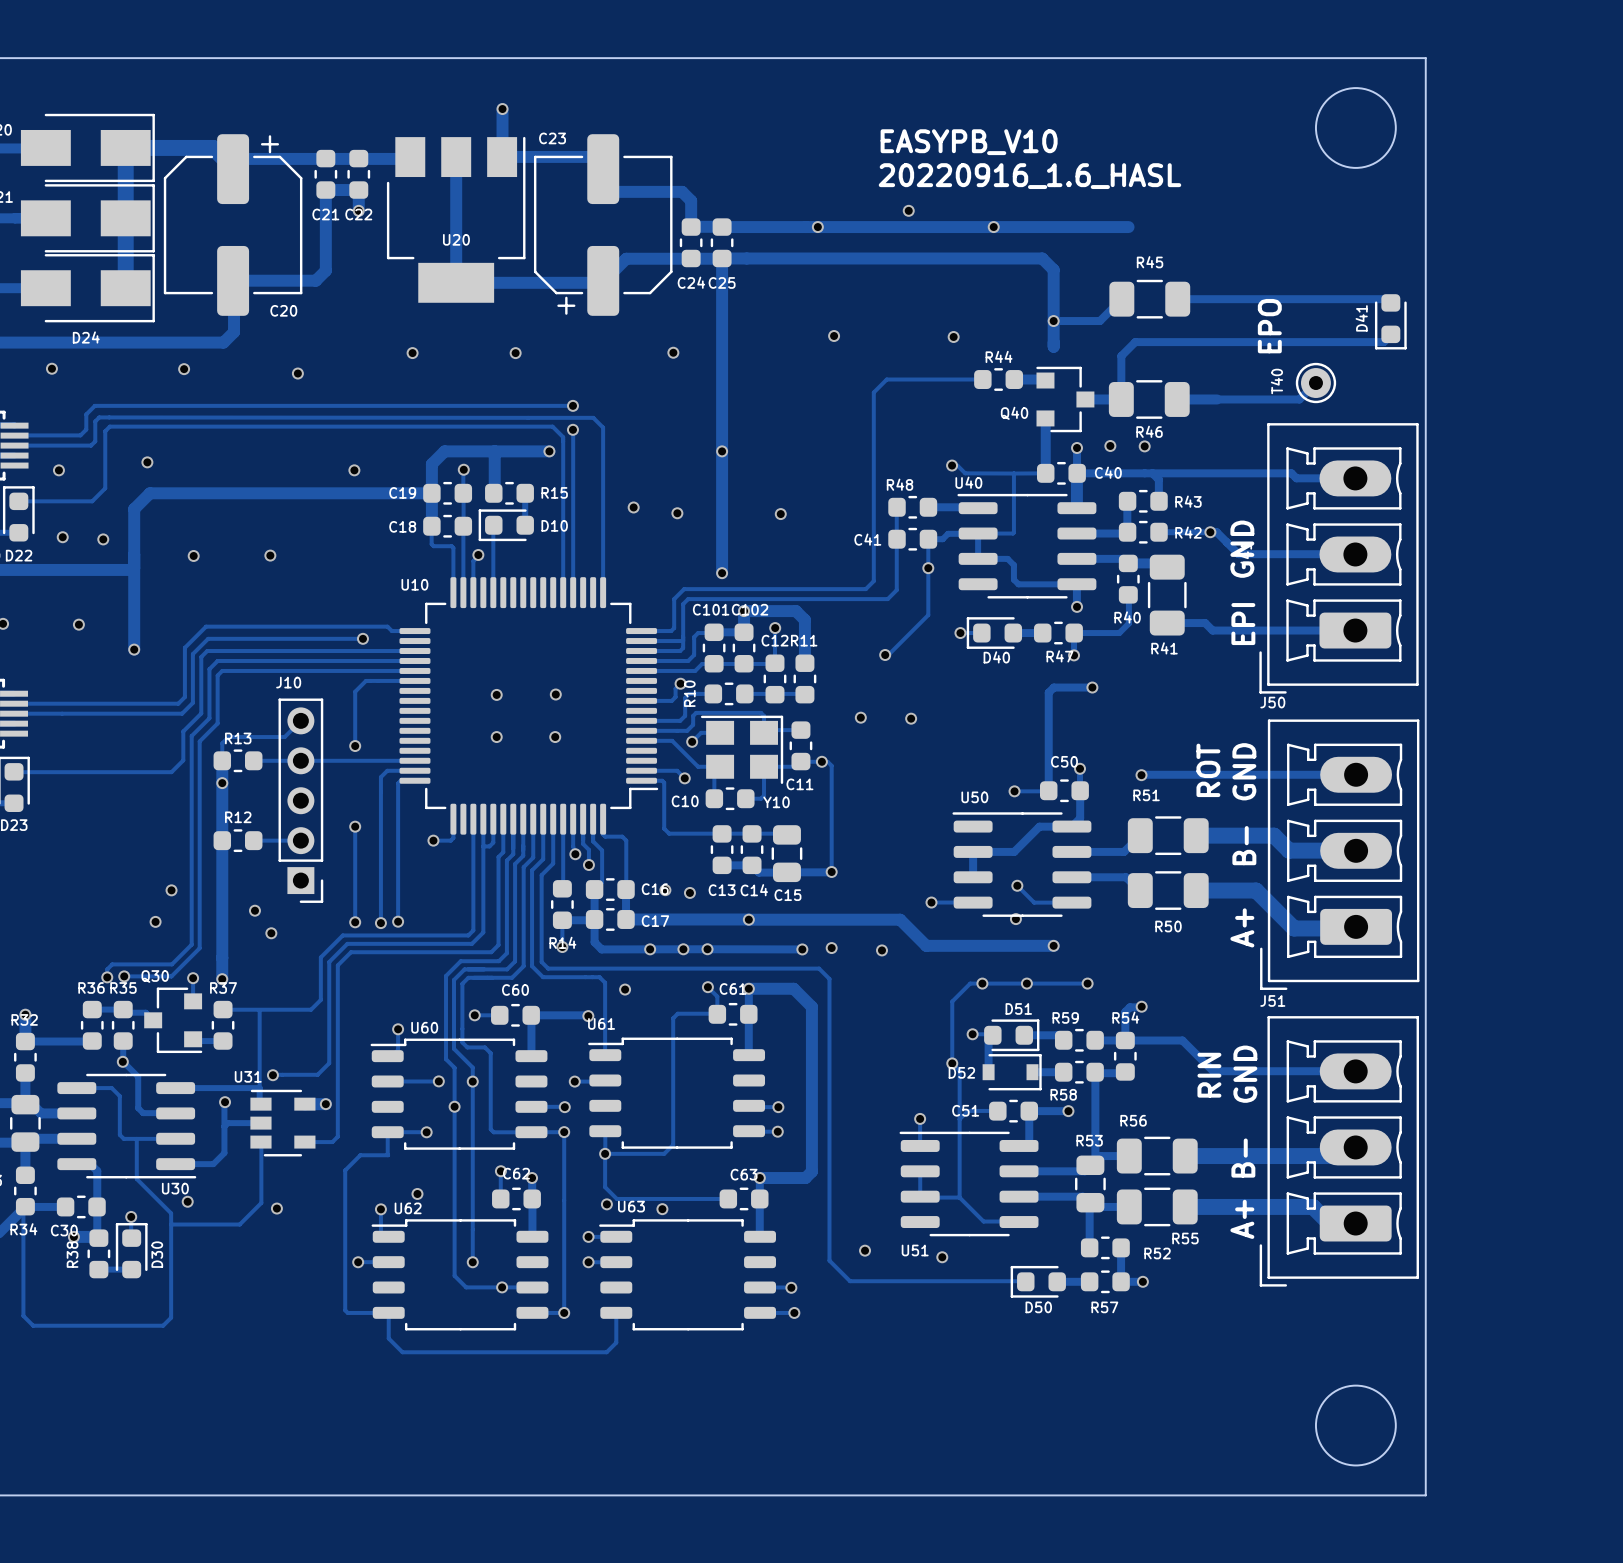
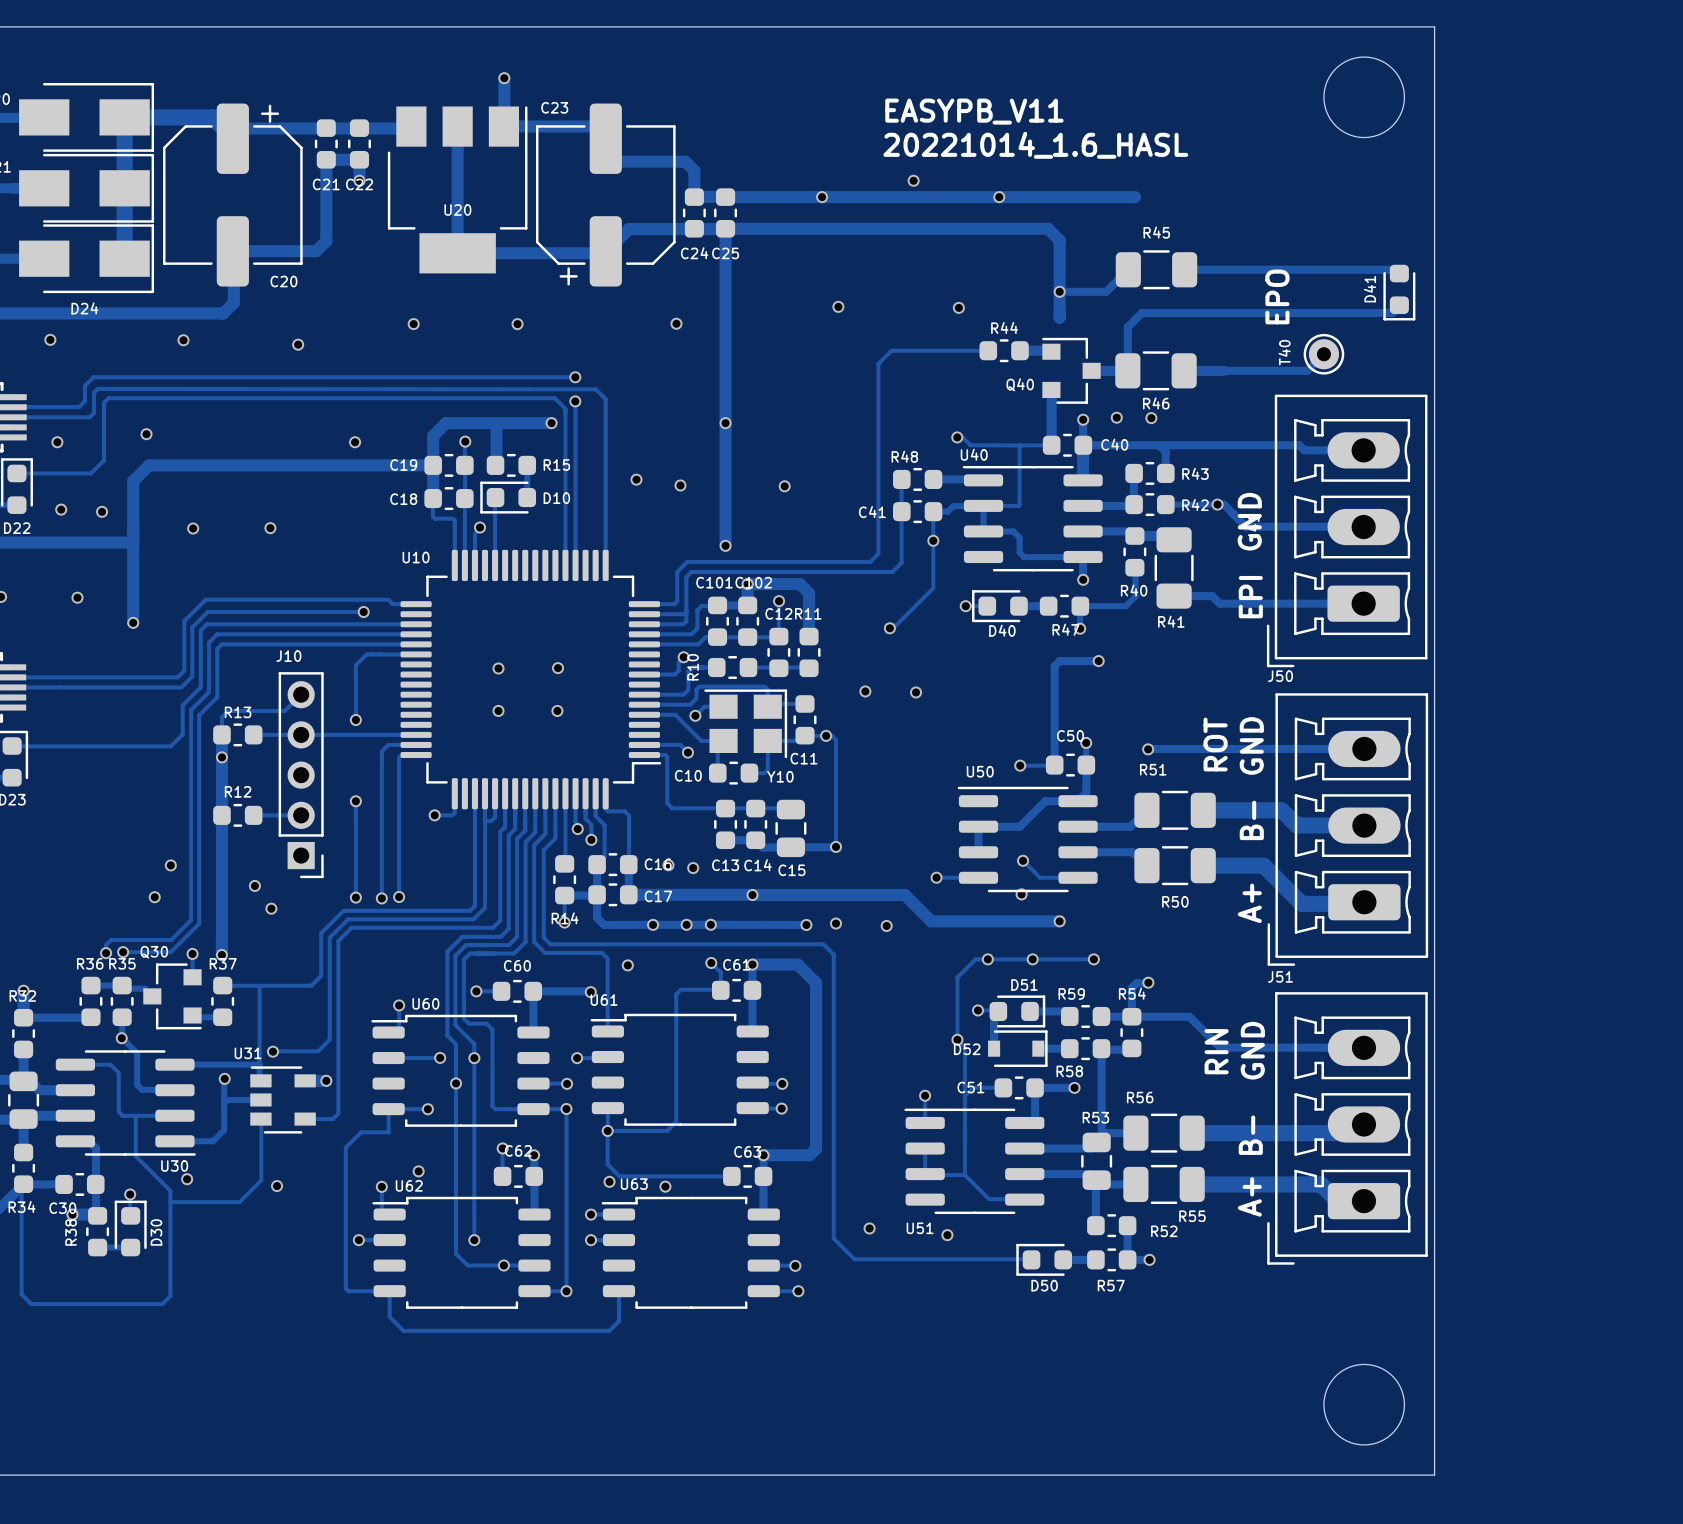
text: EASYPB_V10 (969, 142) -> EASYPB_V11 (974, 111)
text: 20220916_1.6_HASL (1029, 176) -> 20221014_1.6_HASL (1035, 145)

